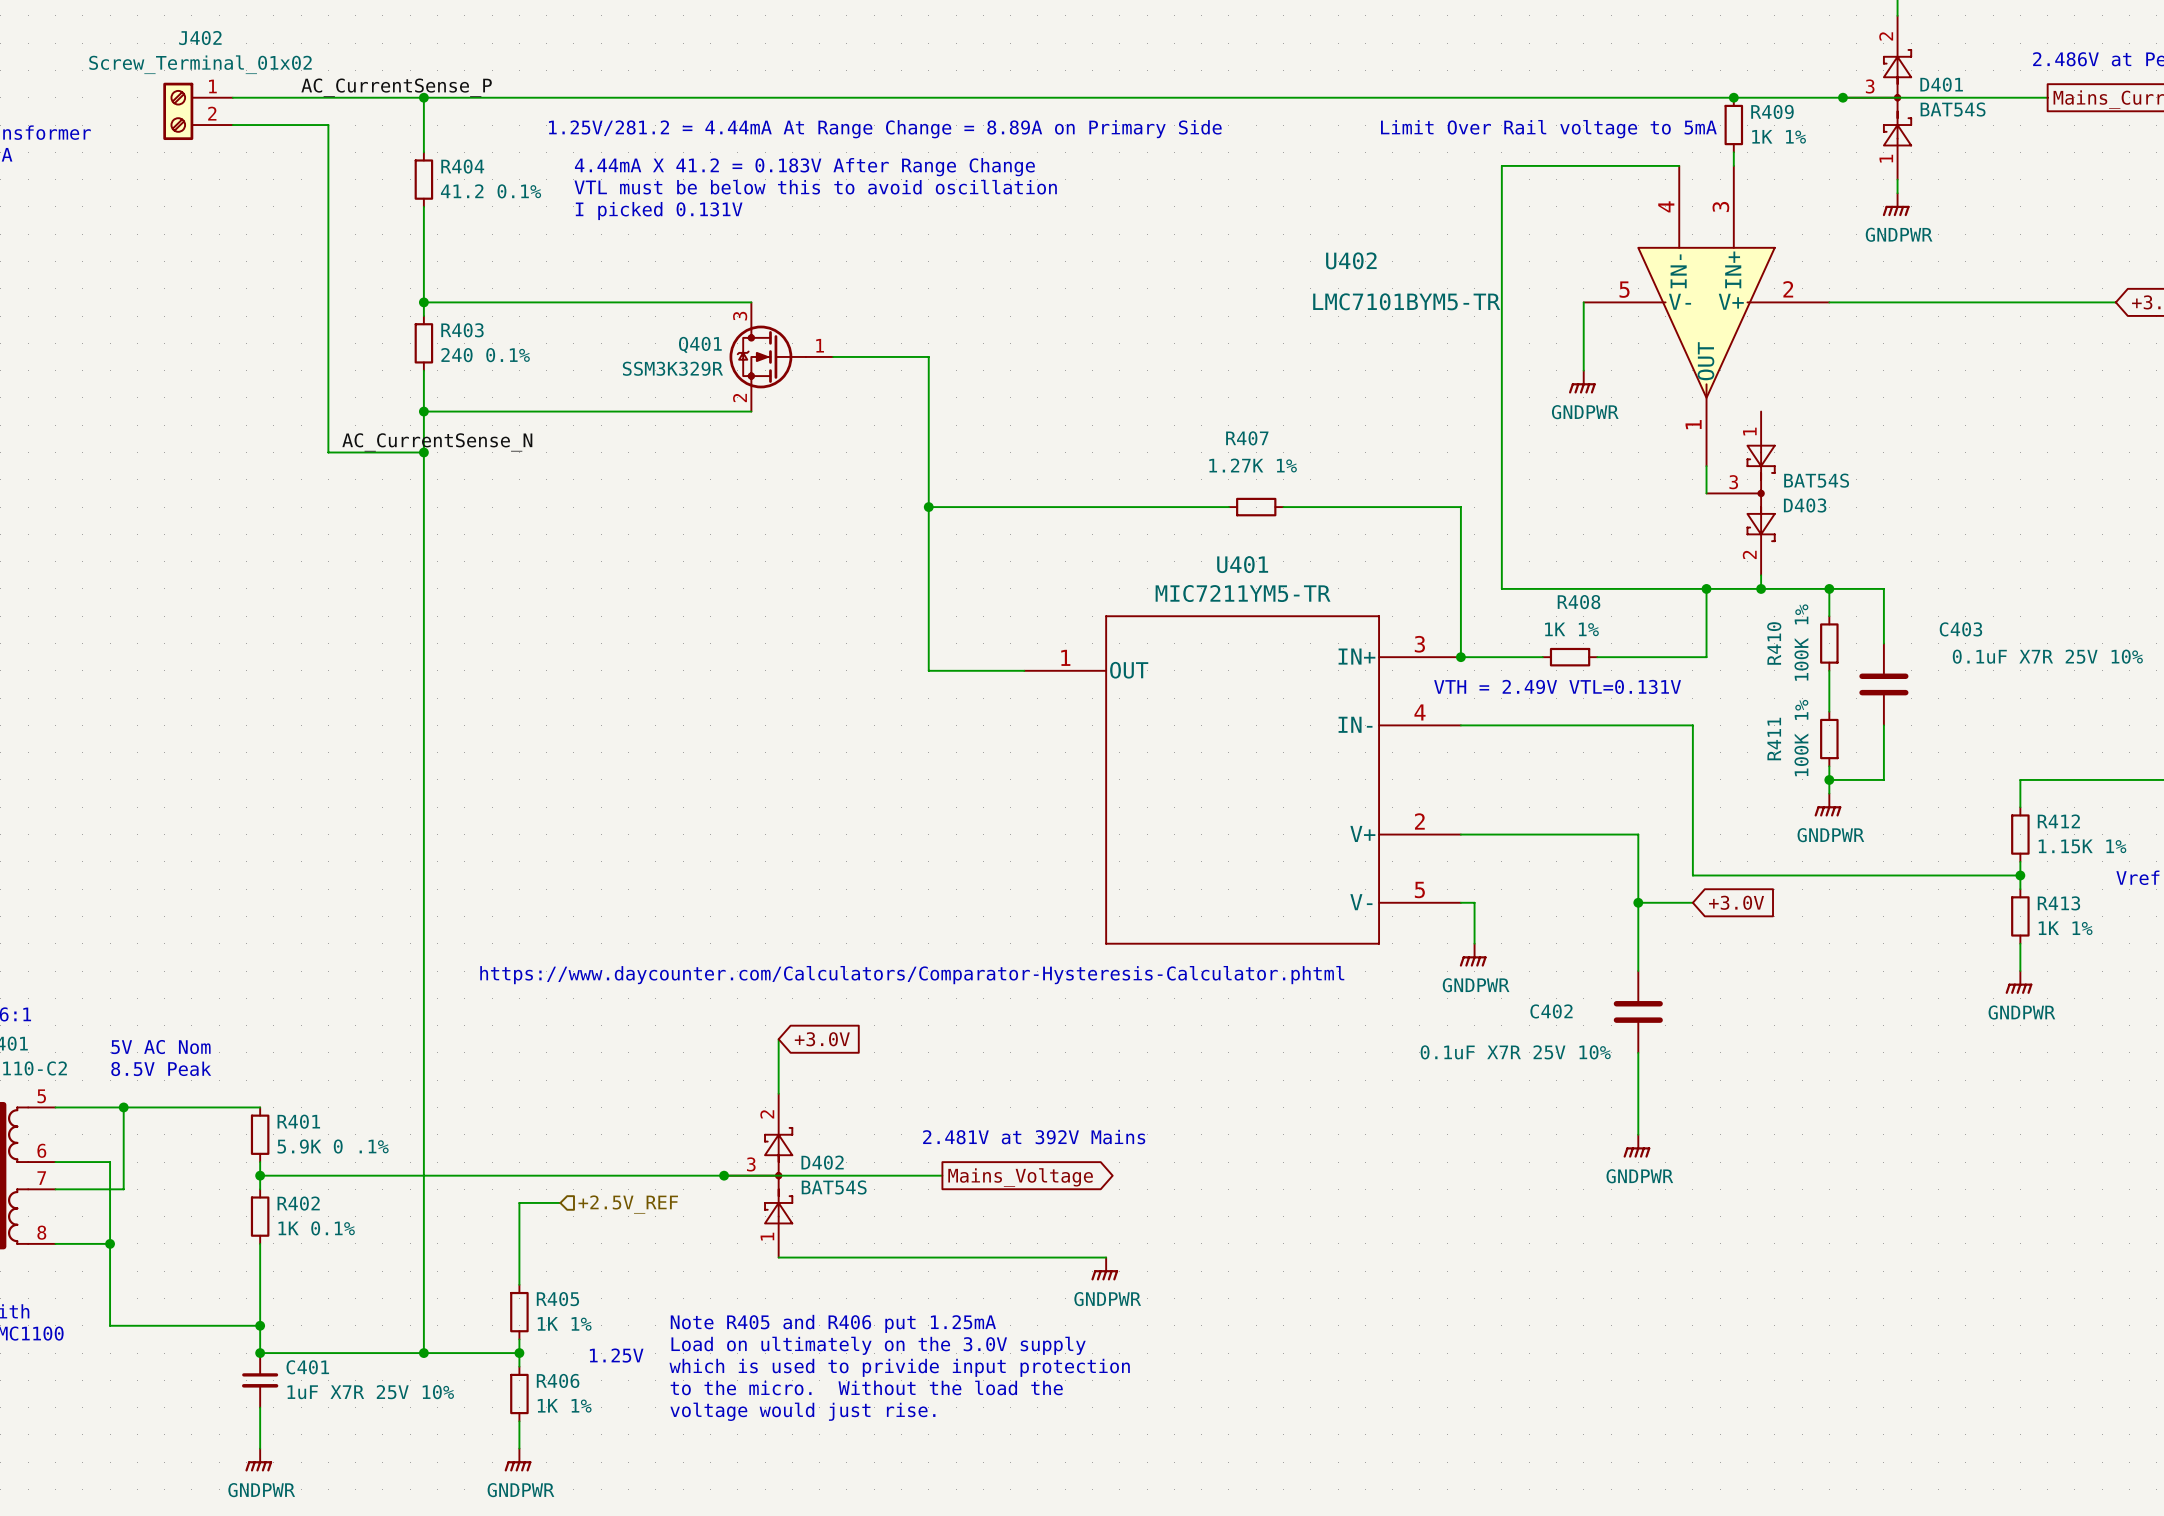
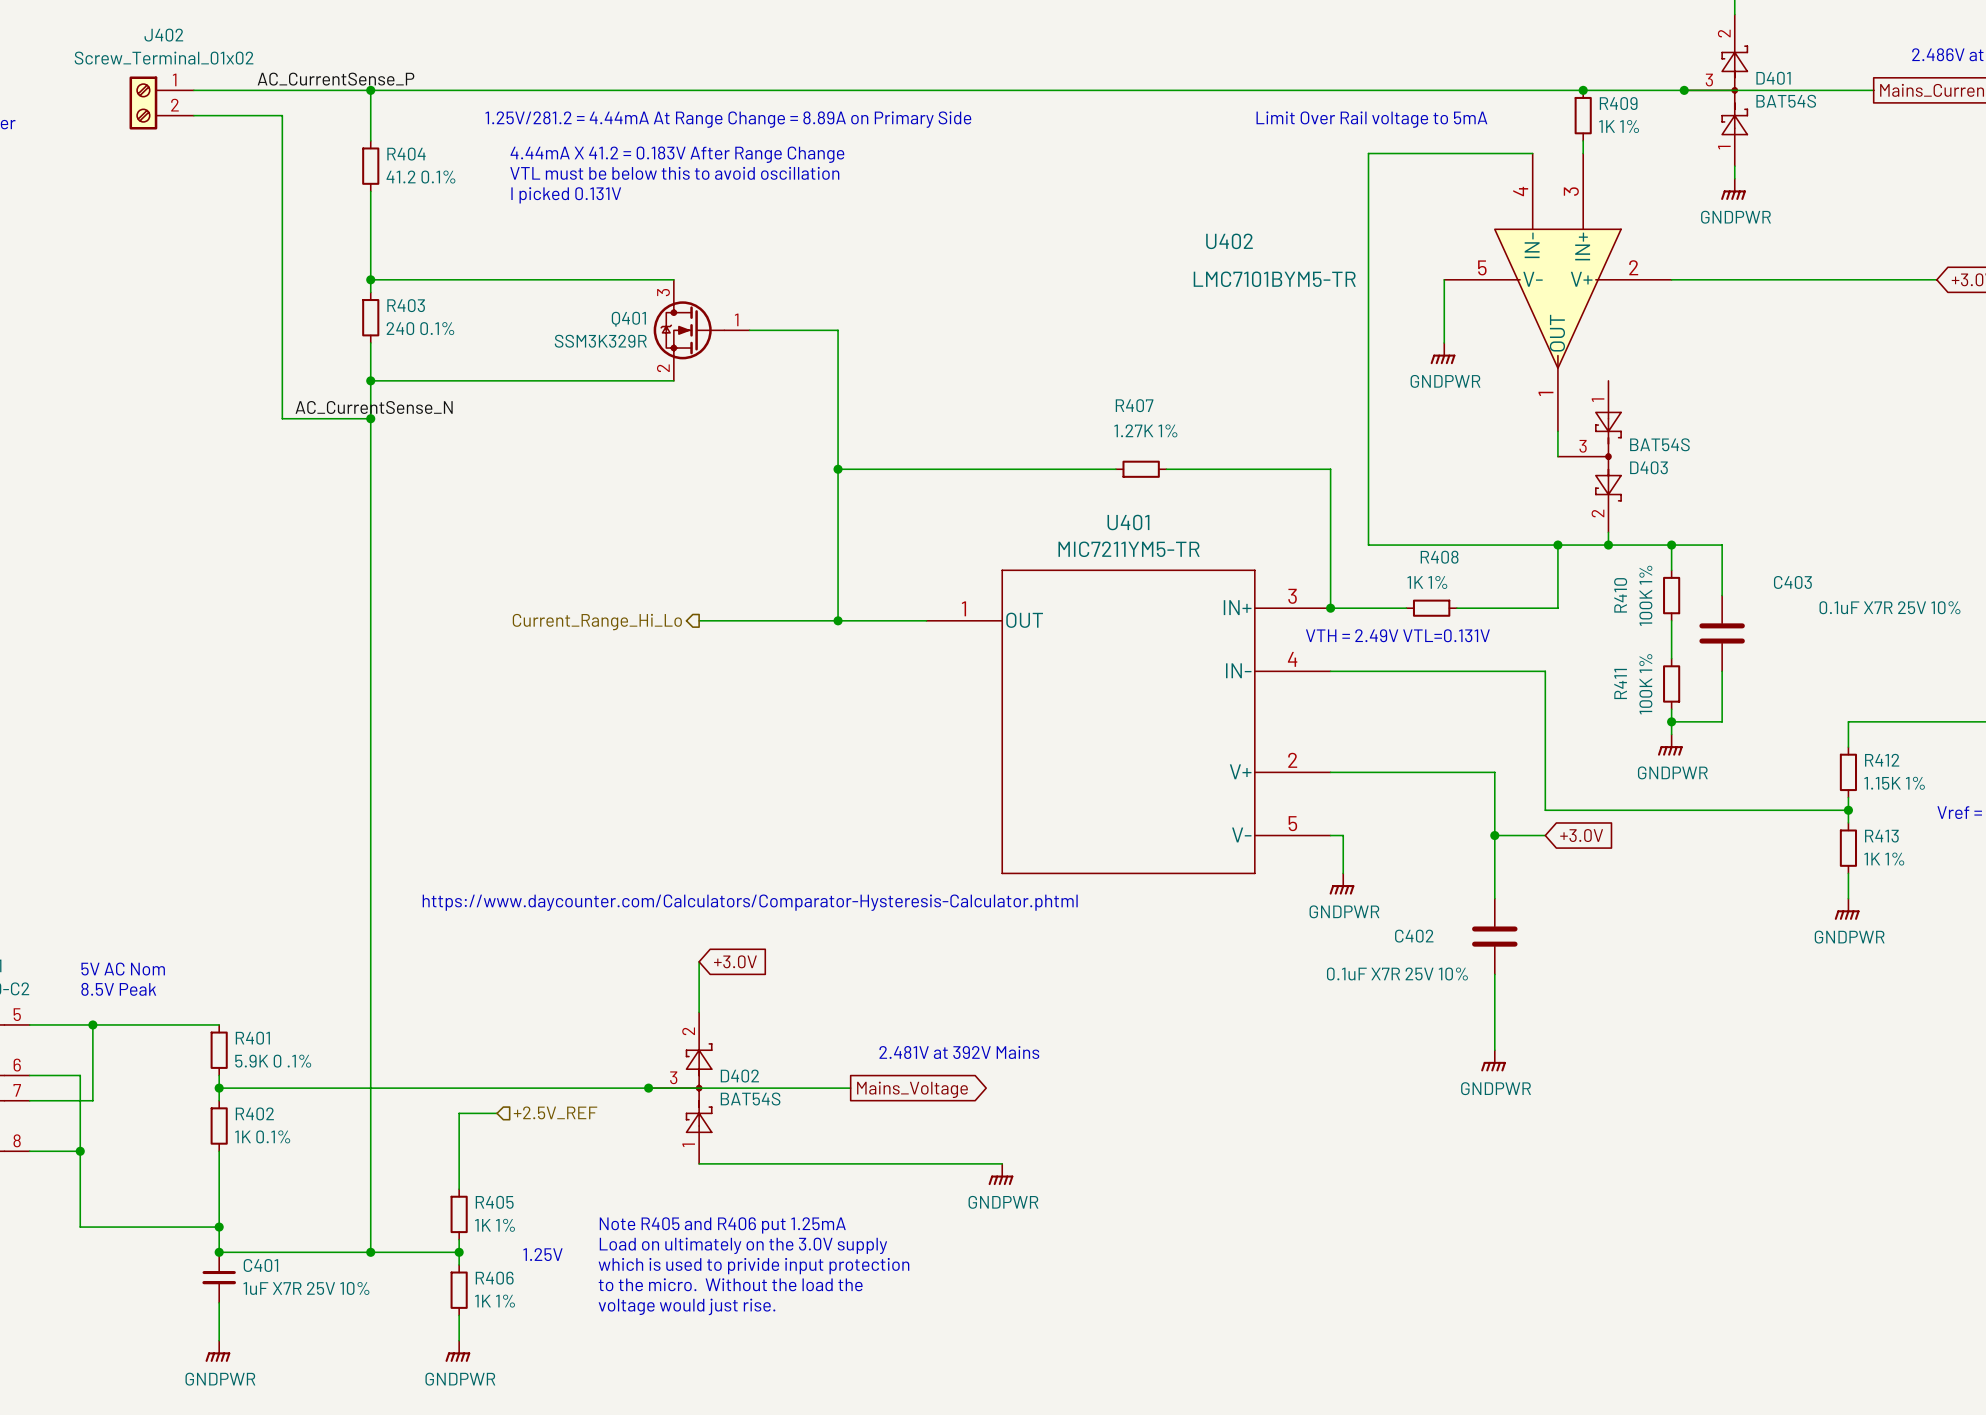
wire: none -> (699, 620) (838, 620)
junction: none -> (838, 620)
hierarchical label: none -> Current_Range_Hi_Lo (597, 622)

